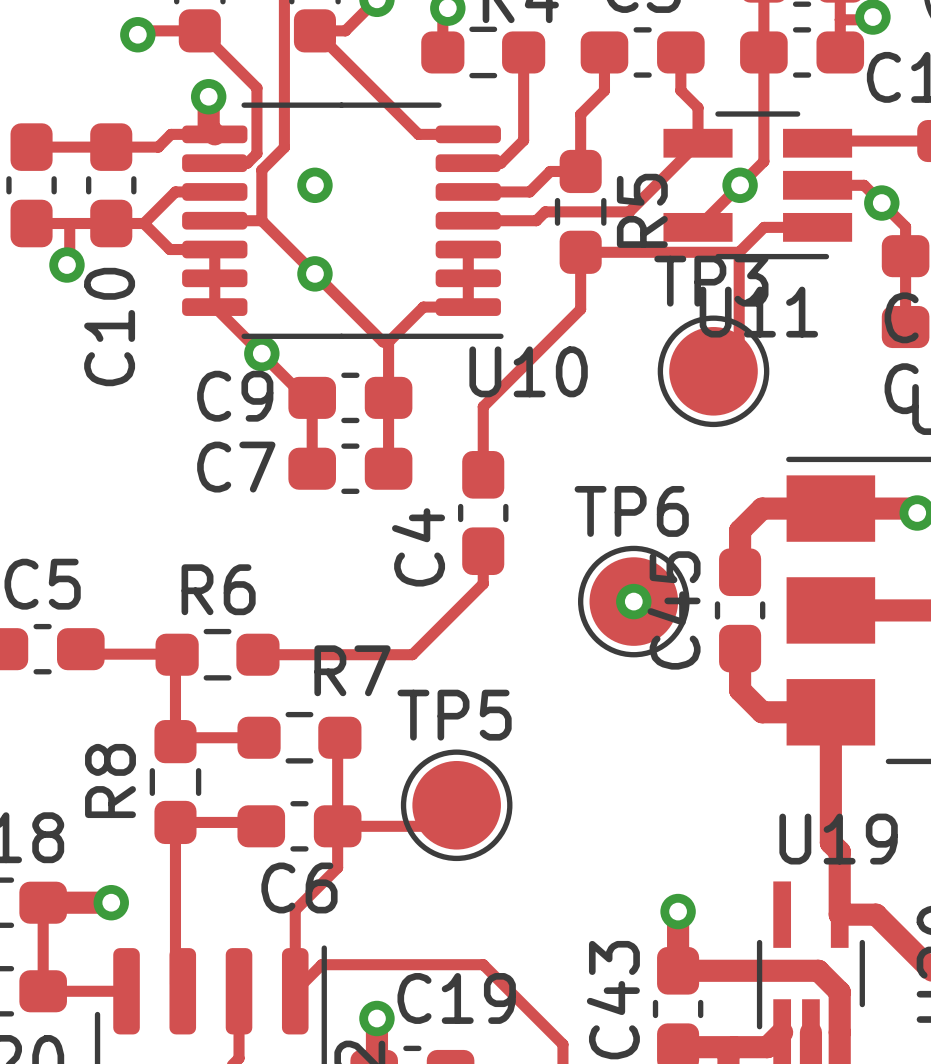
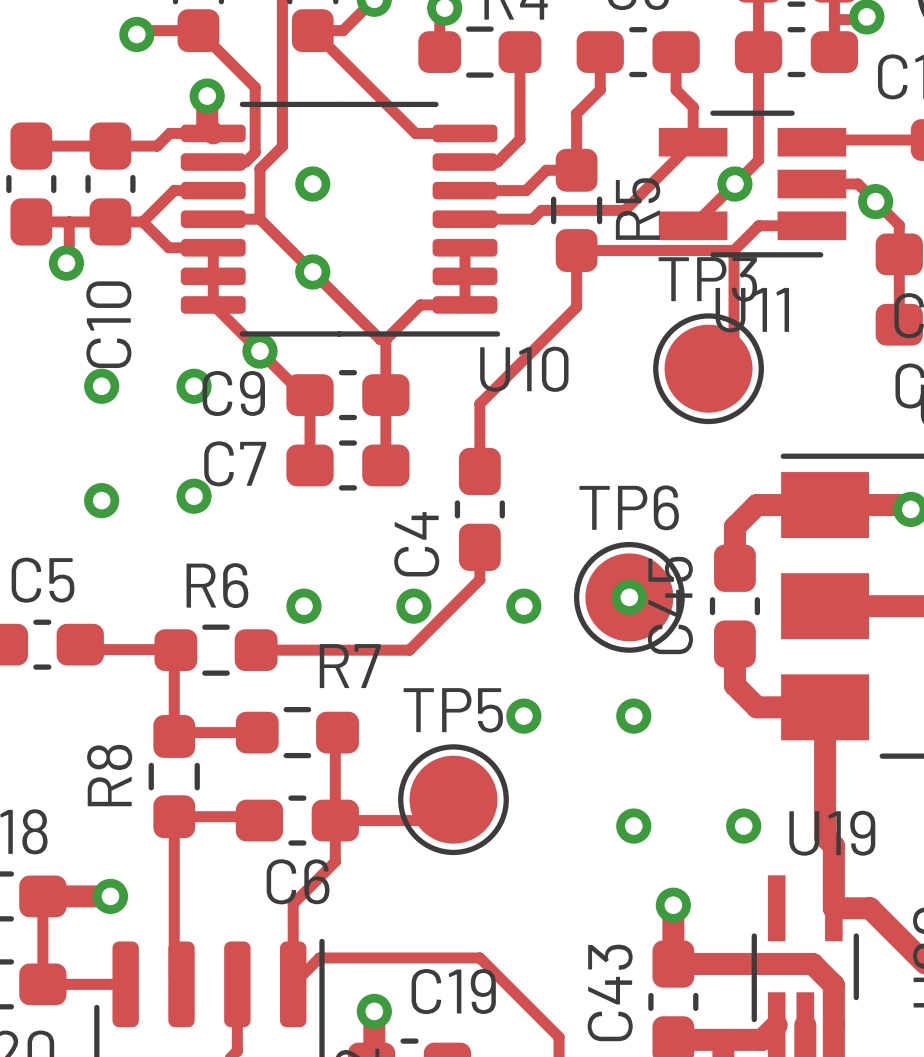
via: none -> (101, 386)
via: none -> (194, 386)
via: none -> (194, 496)
via: none -> (101, 500)
via: none -> (303, 606)
via: none -> (413, 606)
via: none -> (523, 606)
via: none -> (523, 716)
via: none -> (633, 716)
via: none -> (633, 826)
via: none -> (743, 826)

